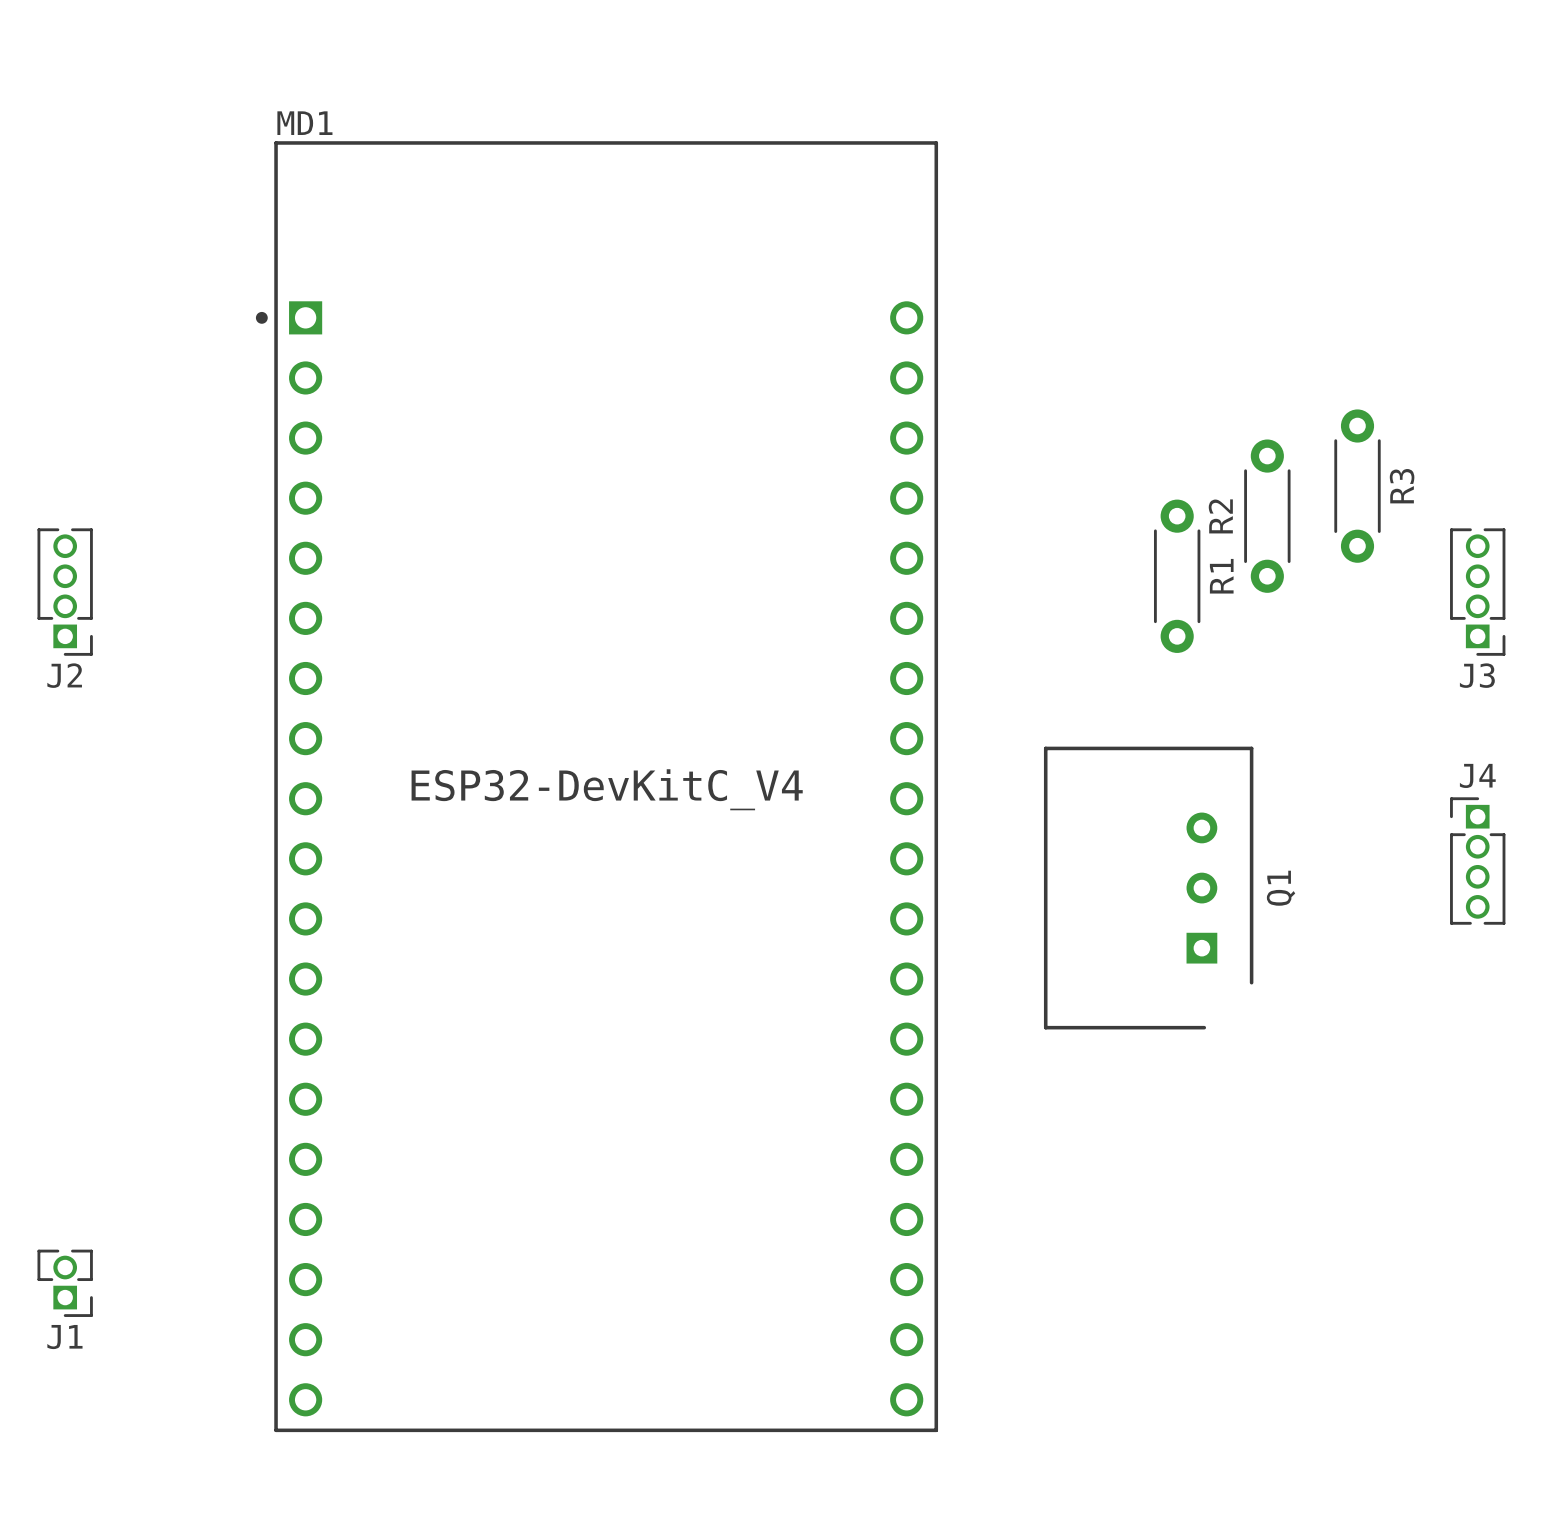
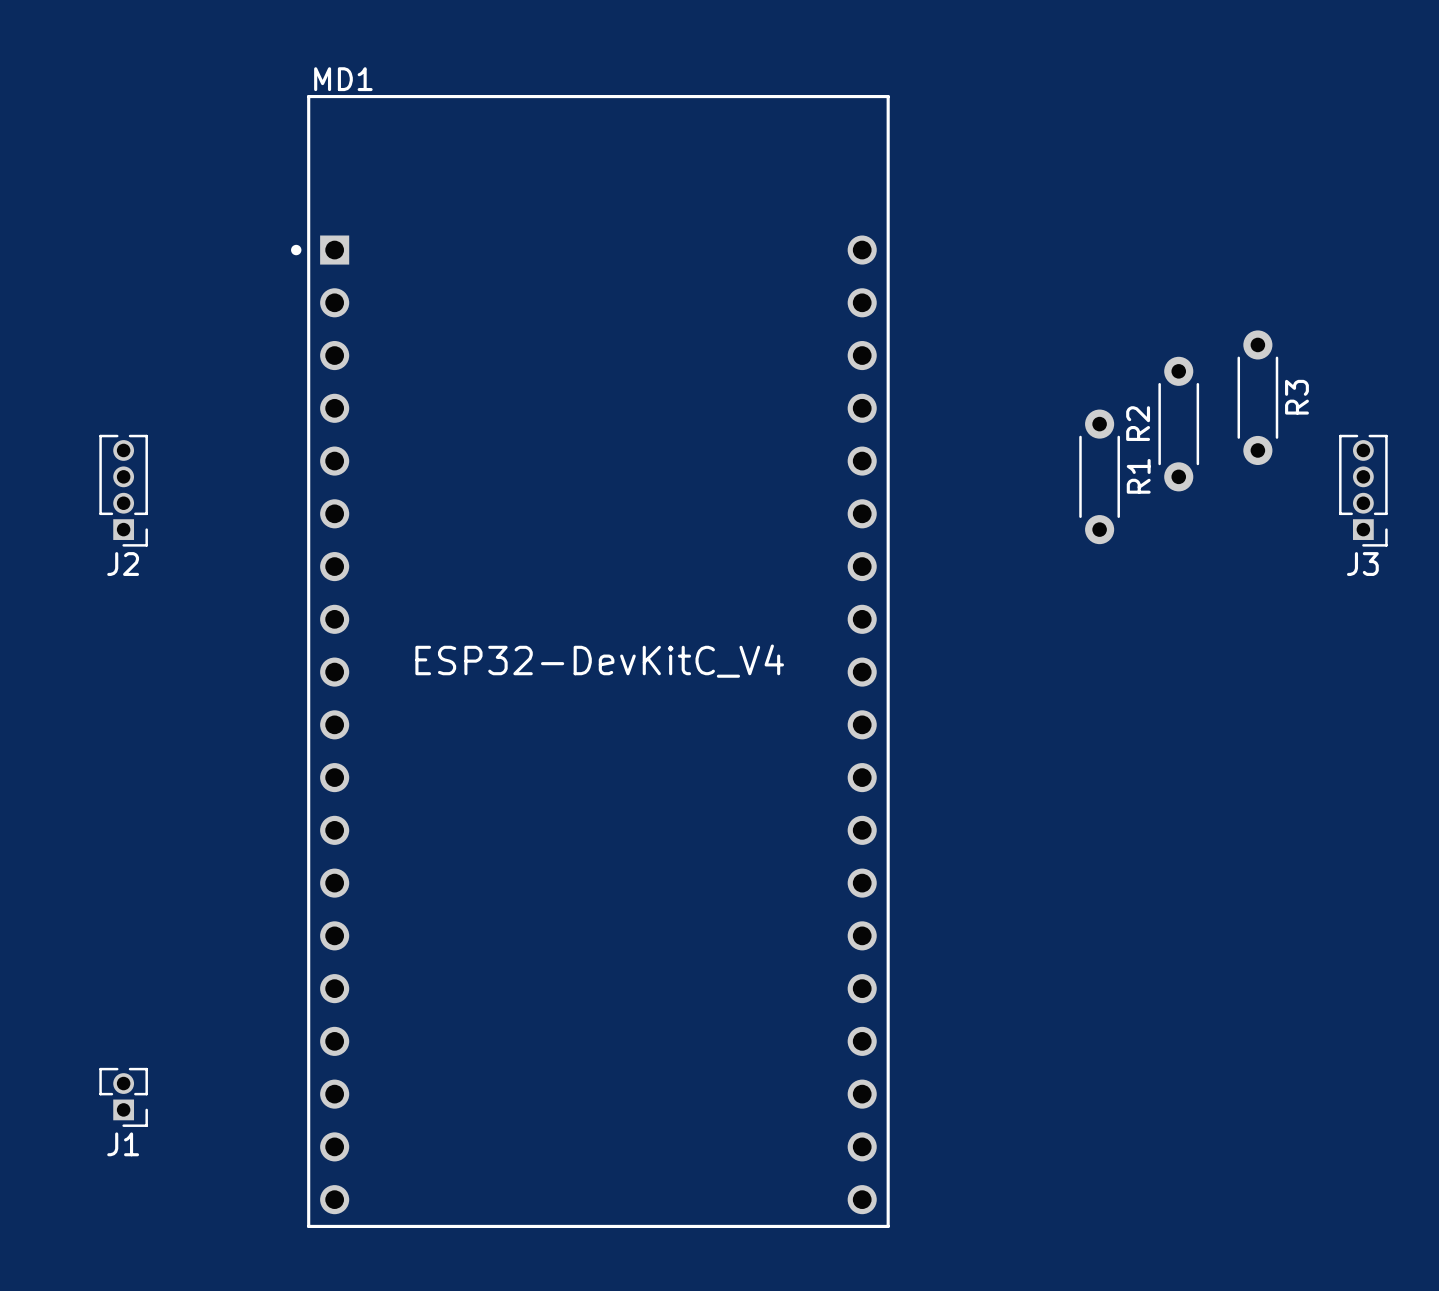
J4: (1477, 861) -> none
Q1: (1148, 888) -> none

